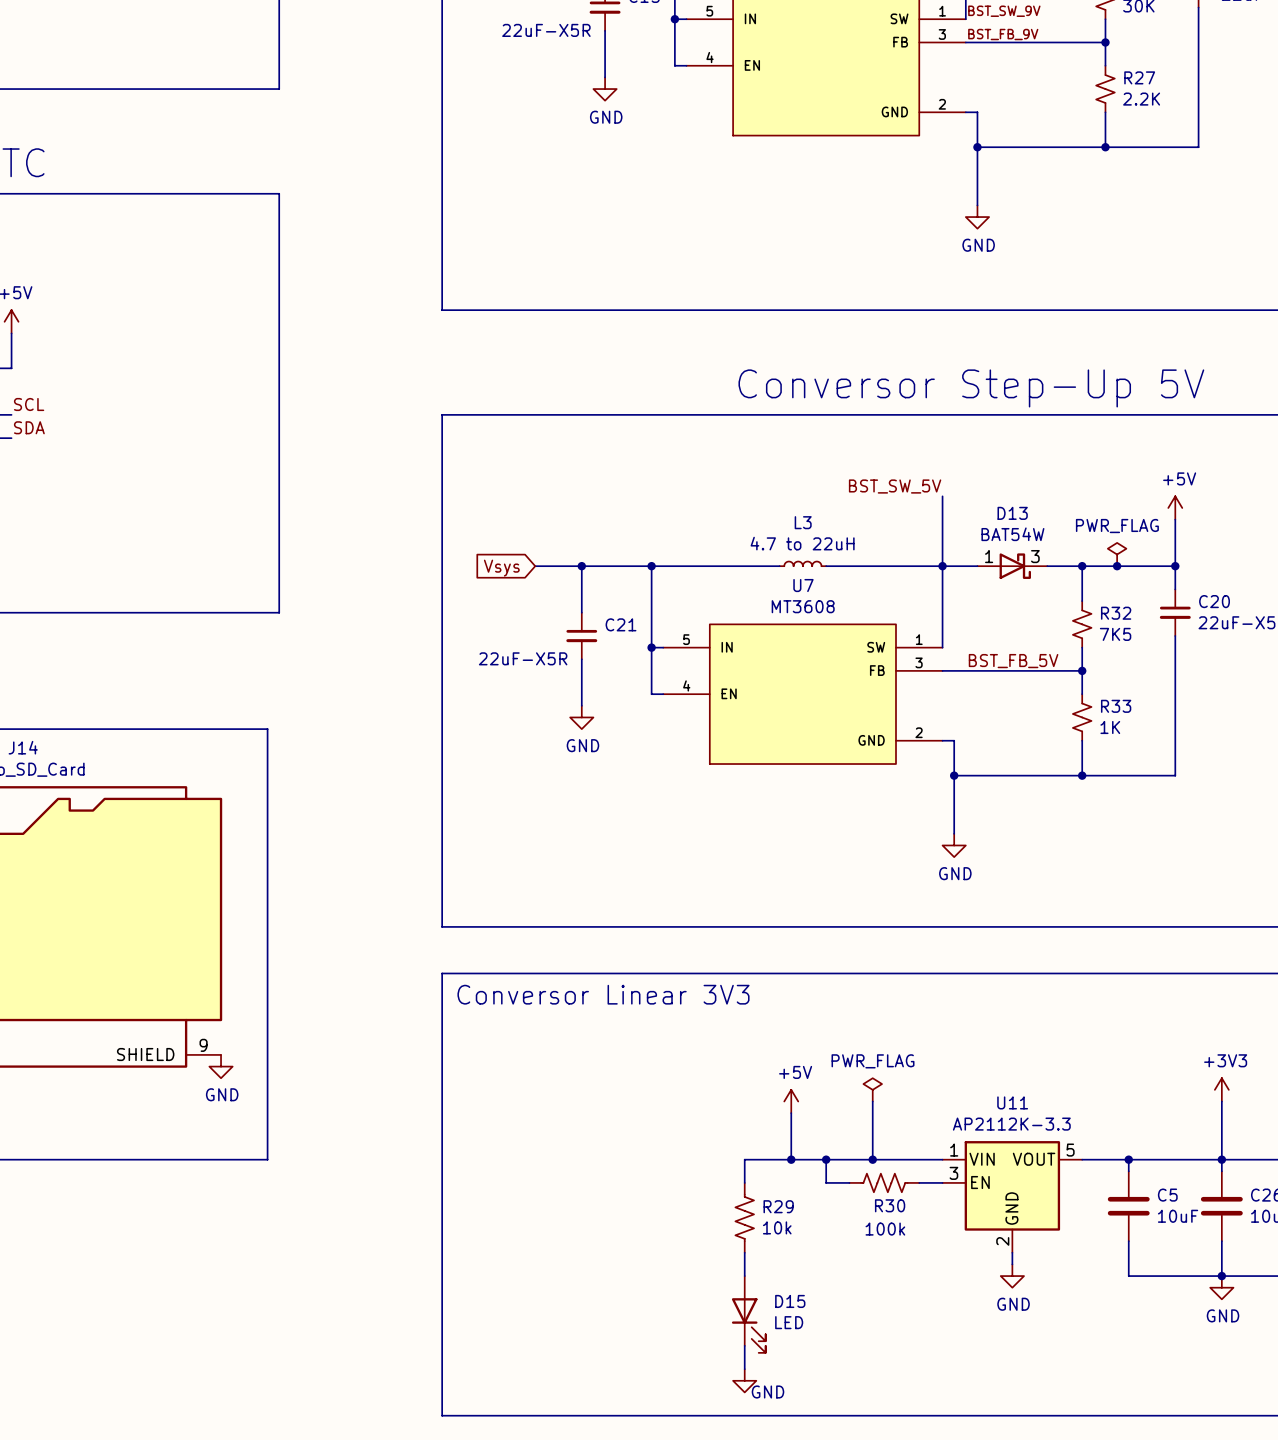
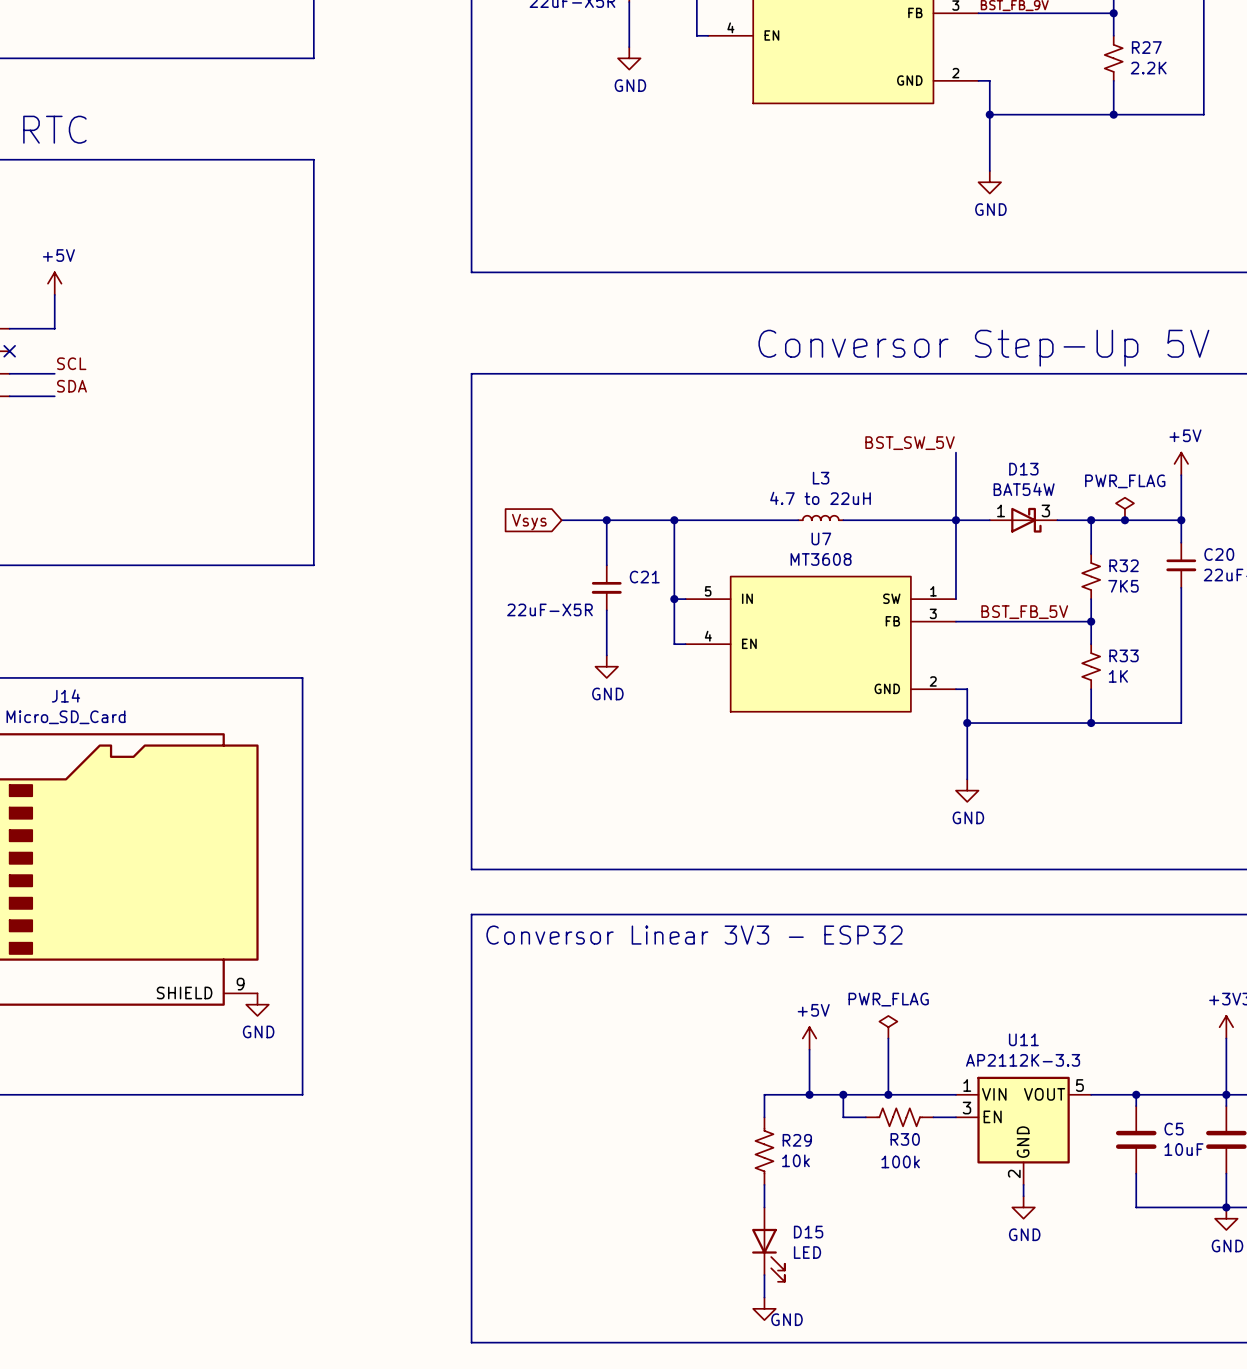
text: Conversor Linear 3V3 (603, 994) -> Conversor Linear 3V3 - ESP32 (694, 935)

